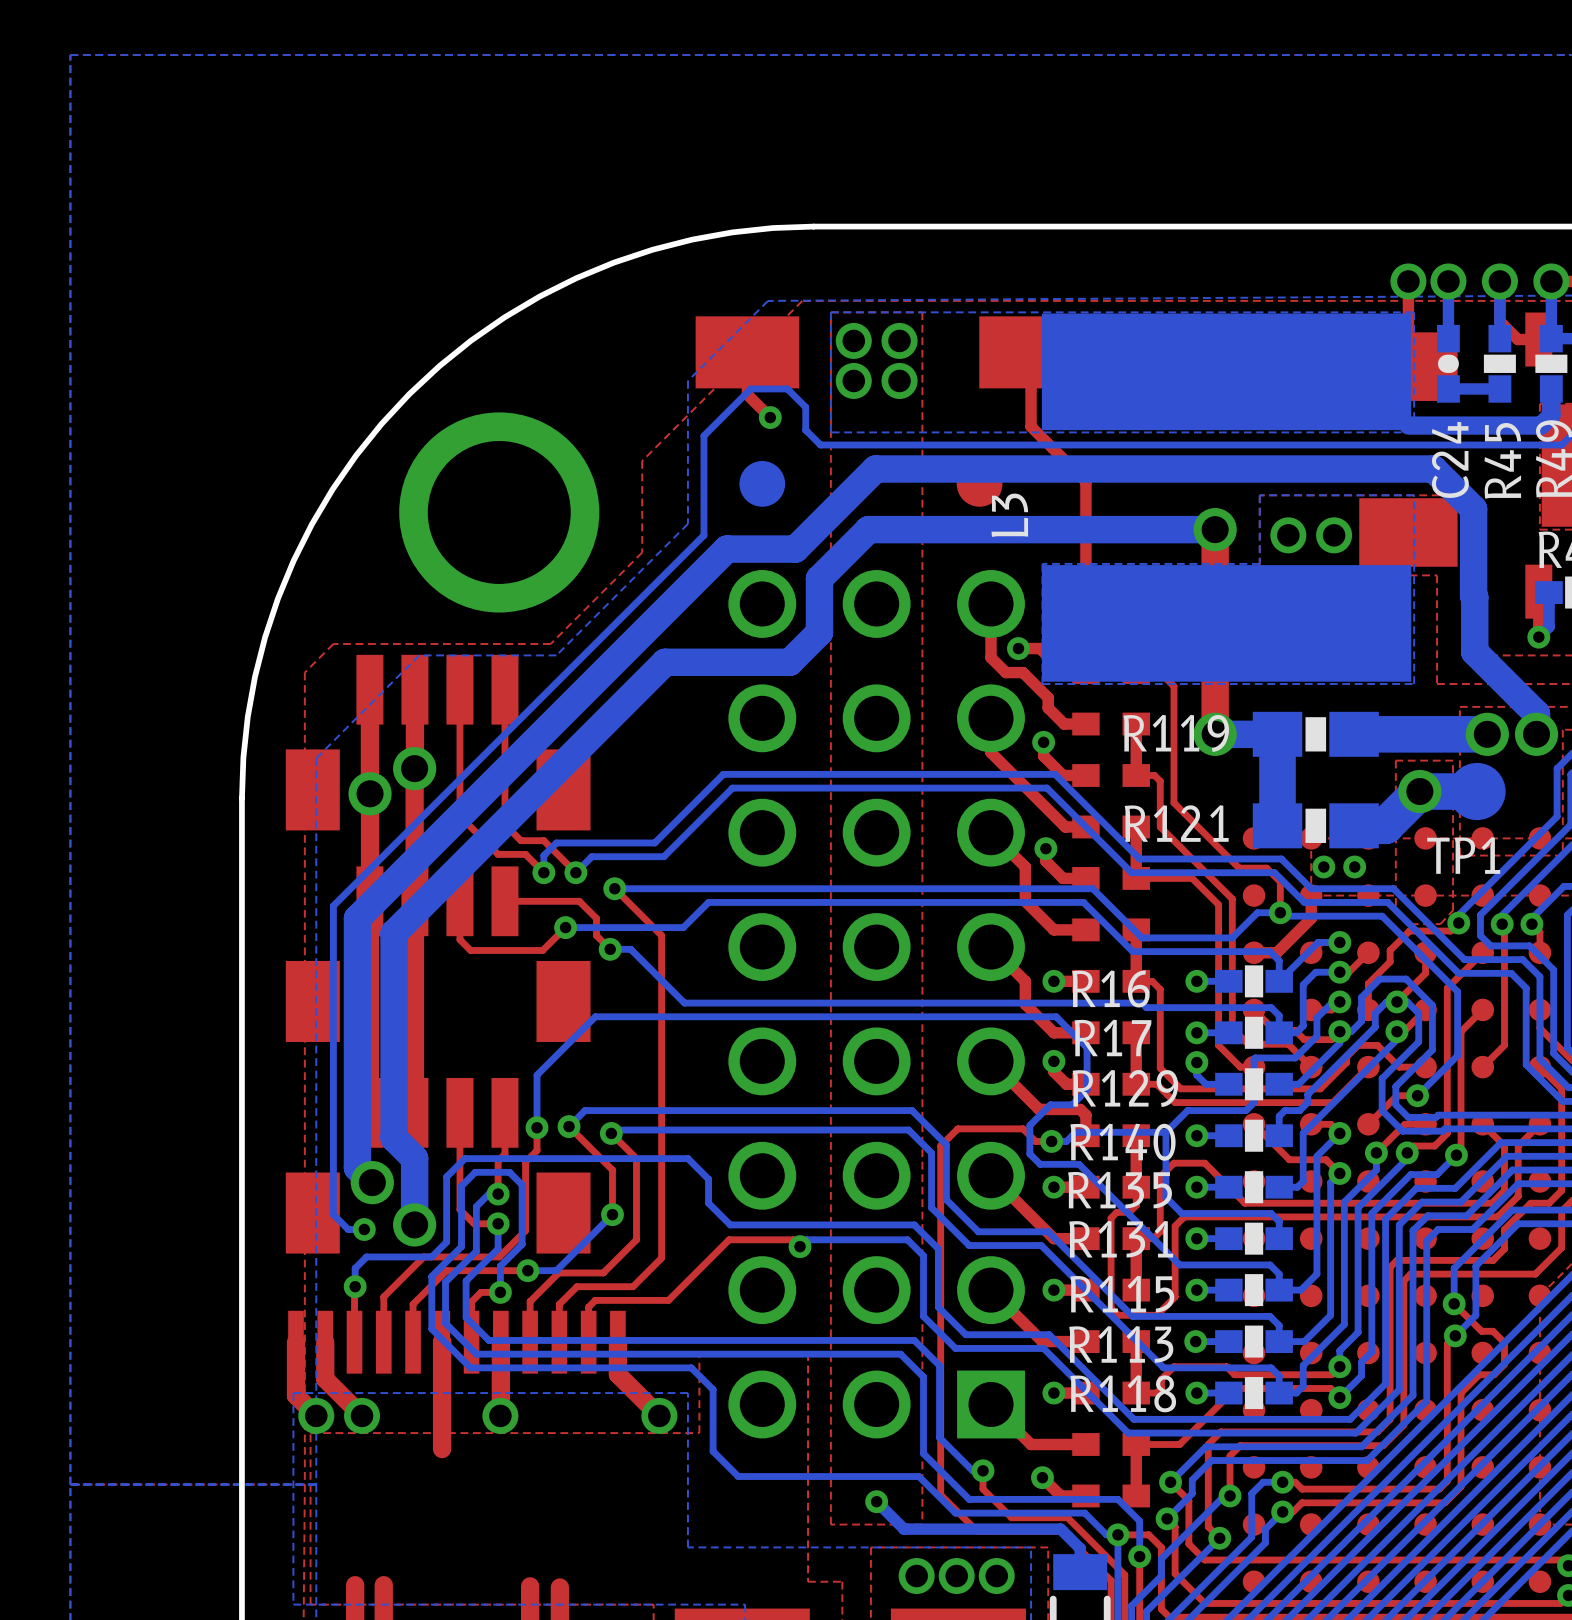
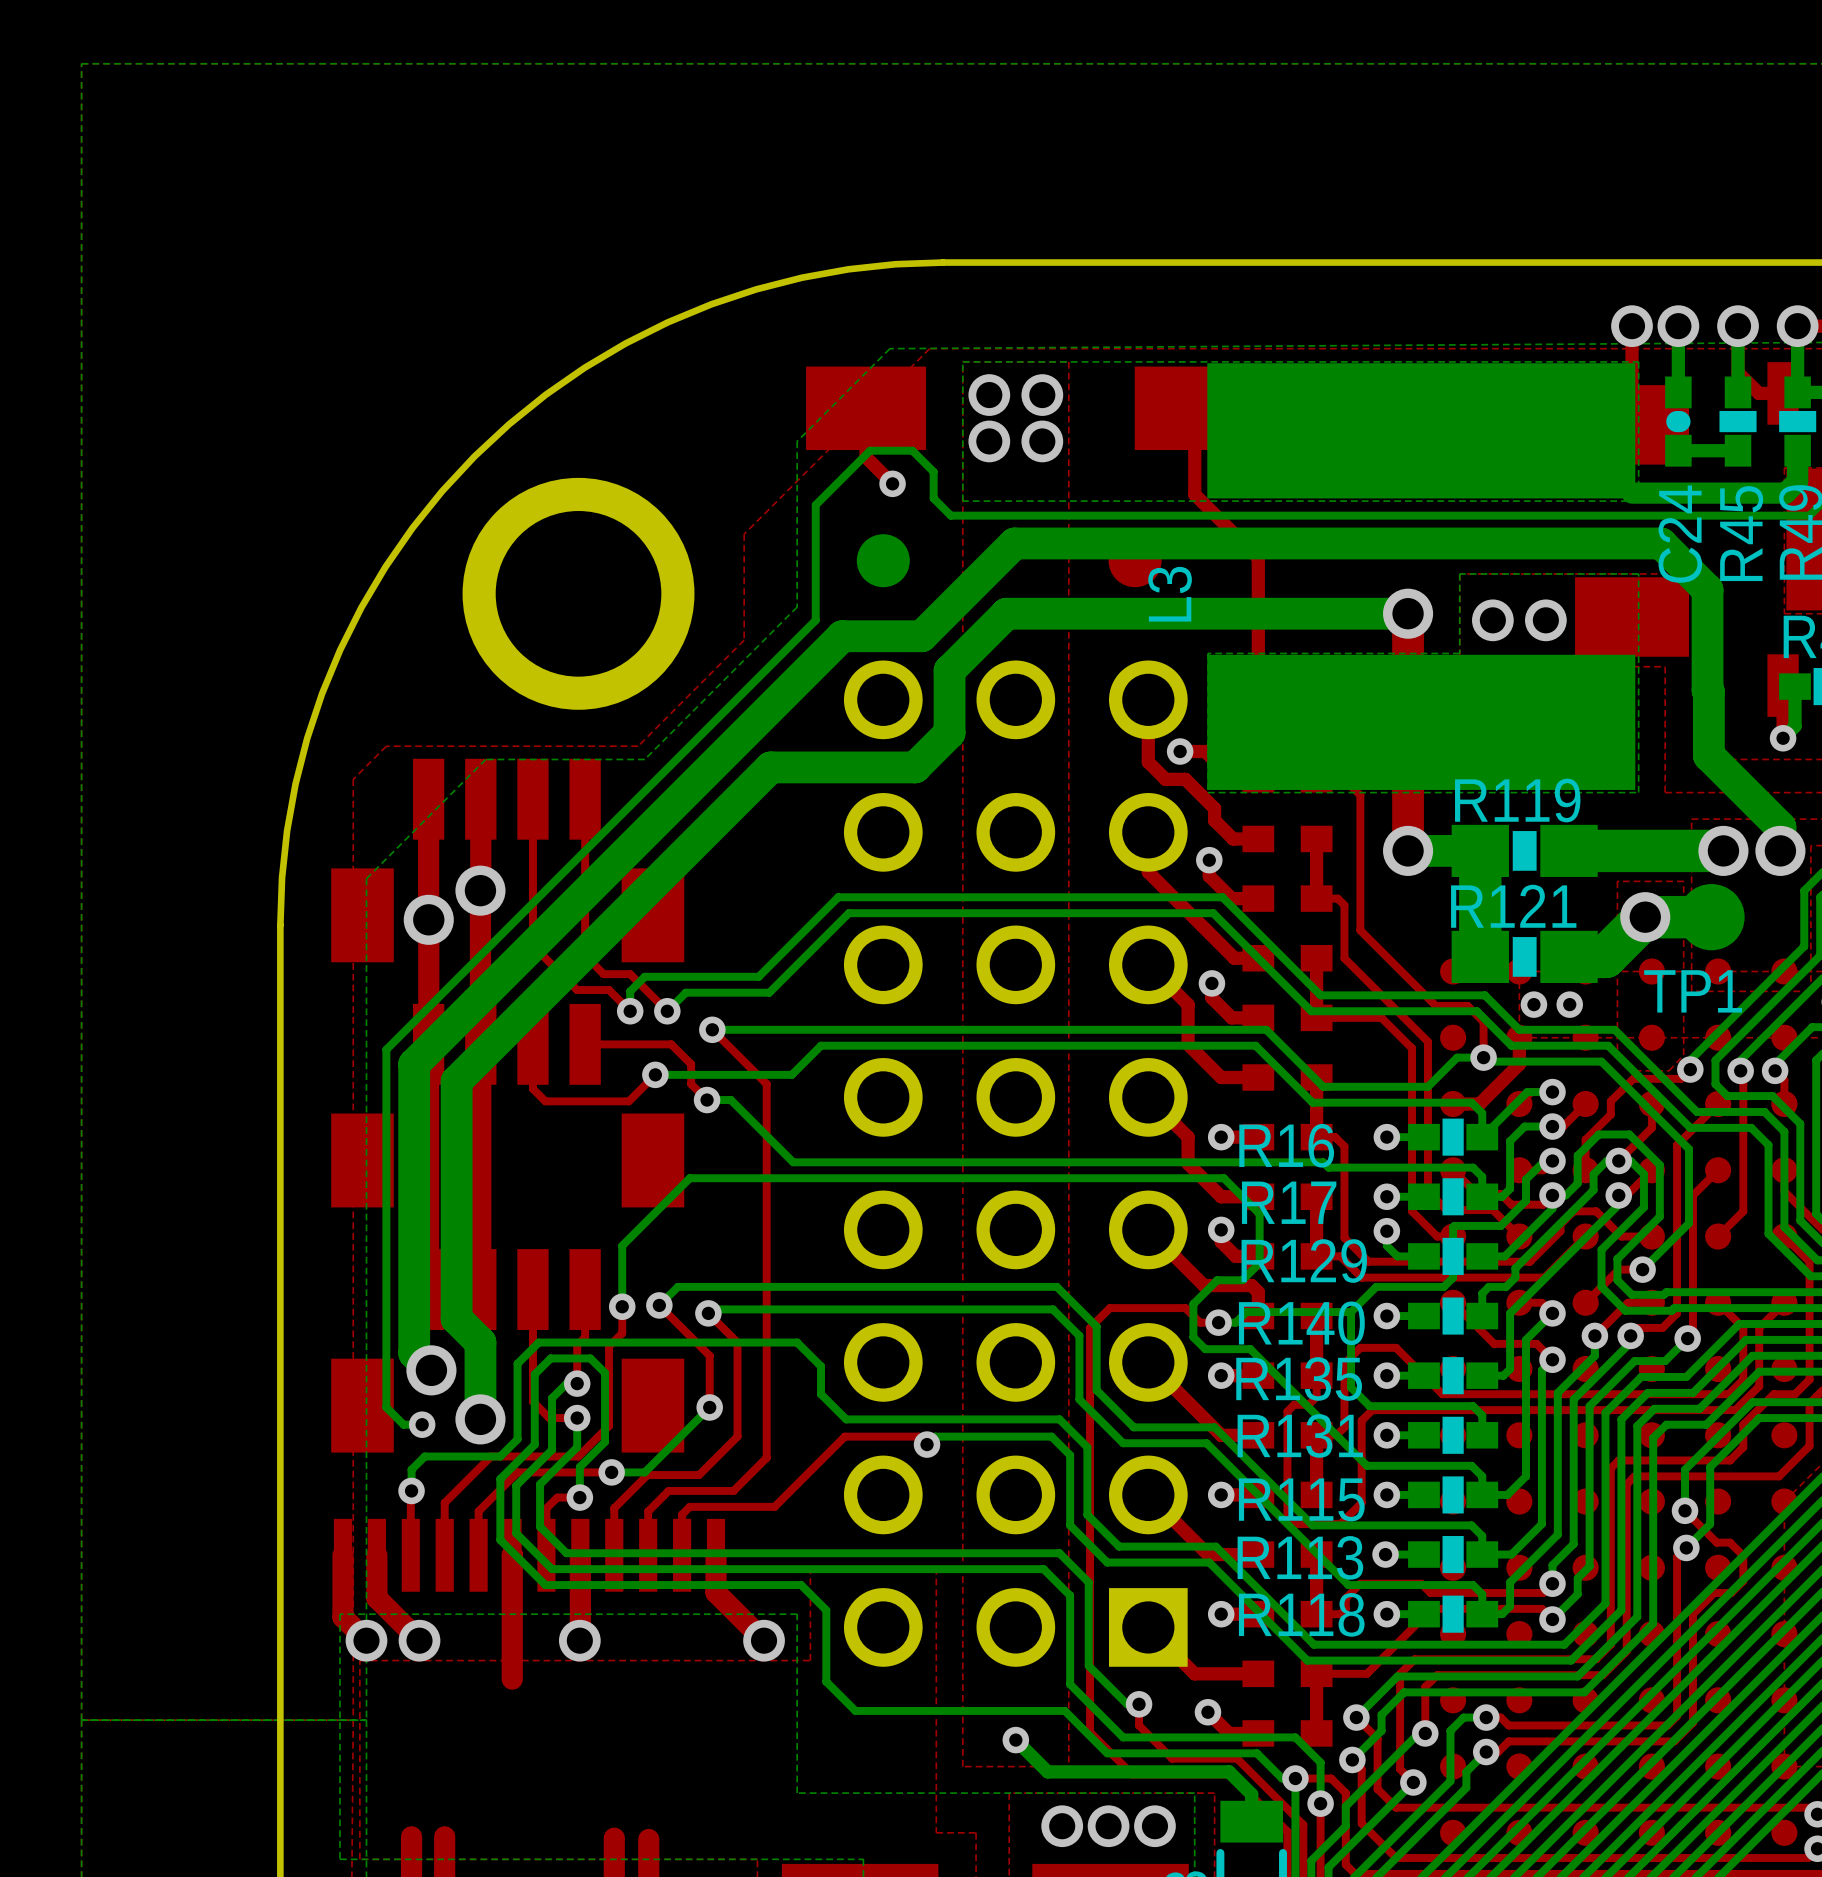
R119 name position: R119 (1176, 733) -> R119 (1517, 800)
R121 name position: R121 (1176, 823) -> R121 (1513, 906)

